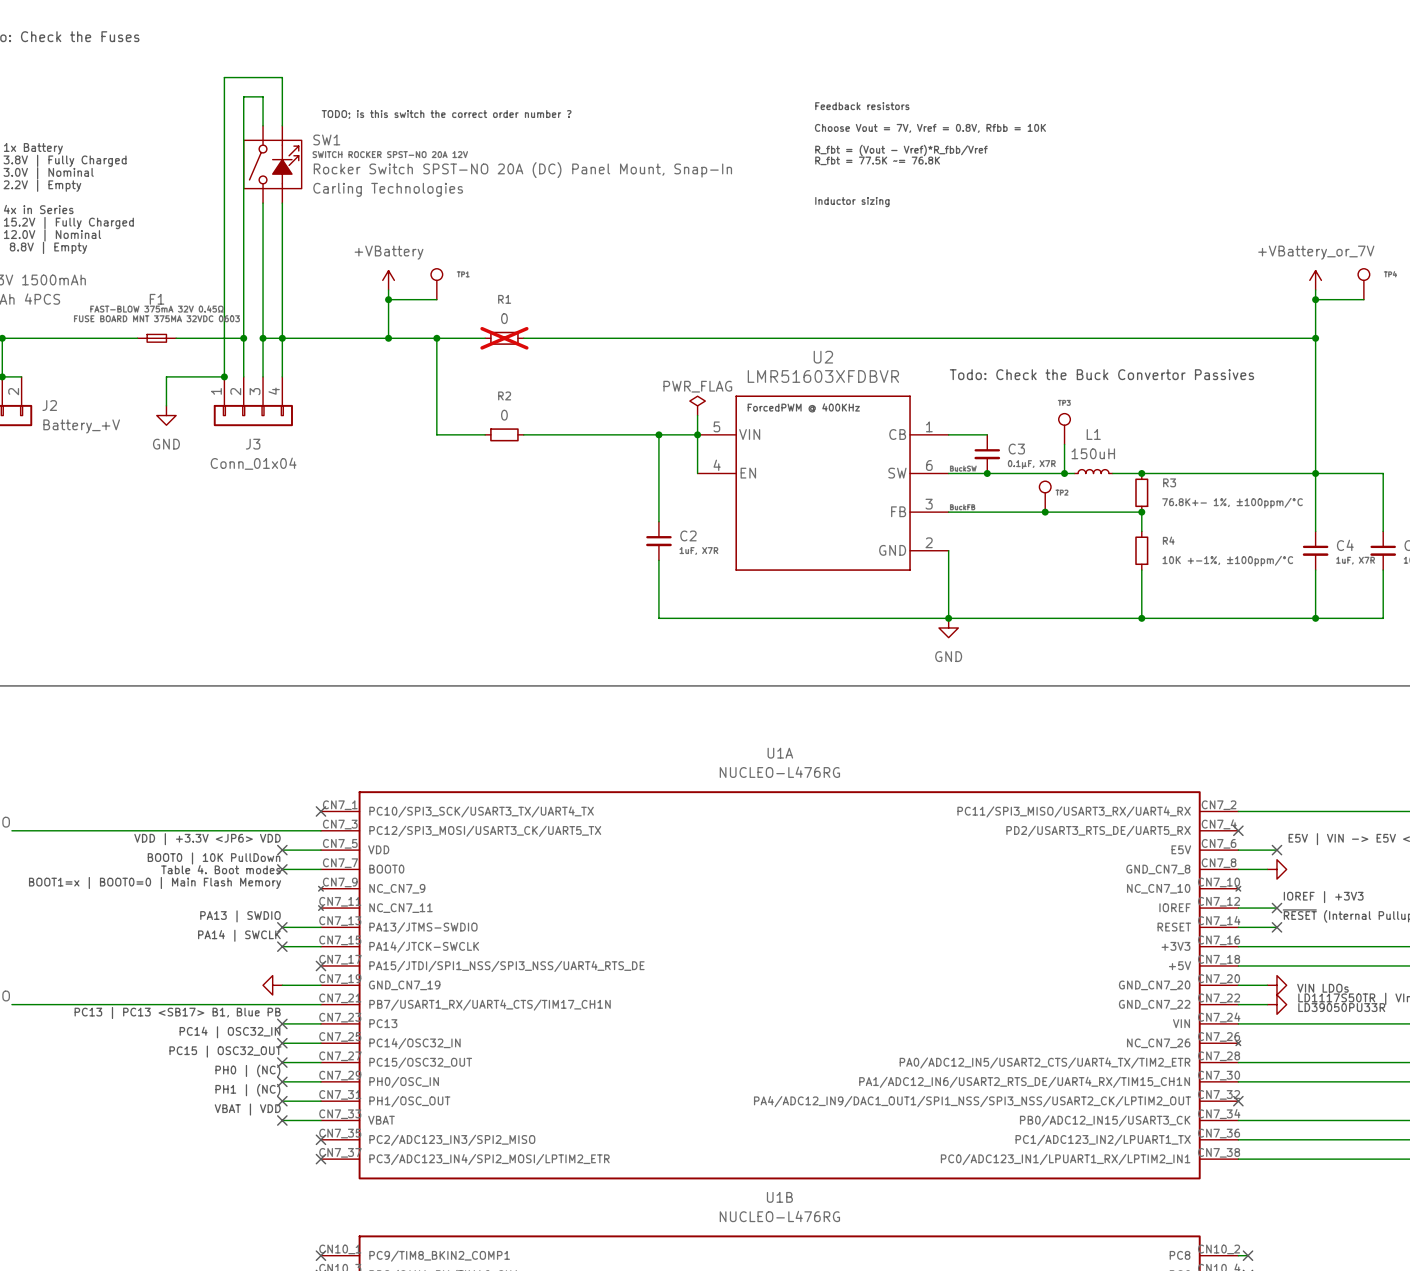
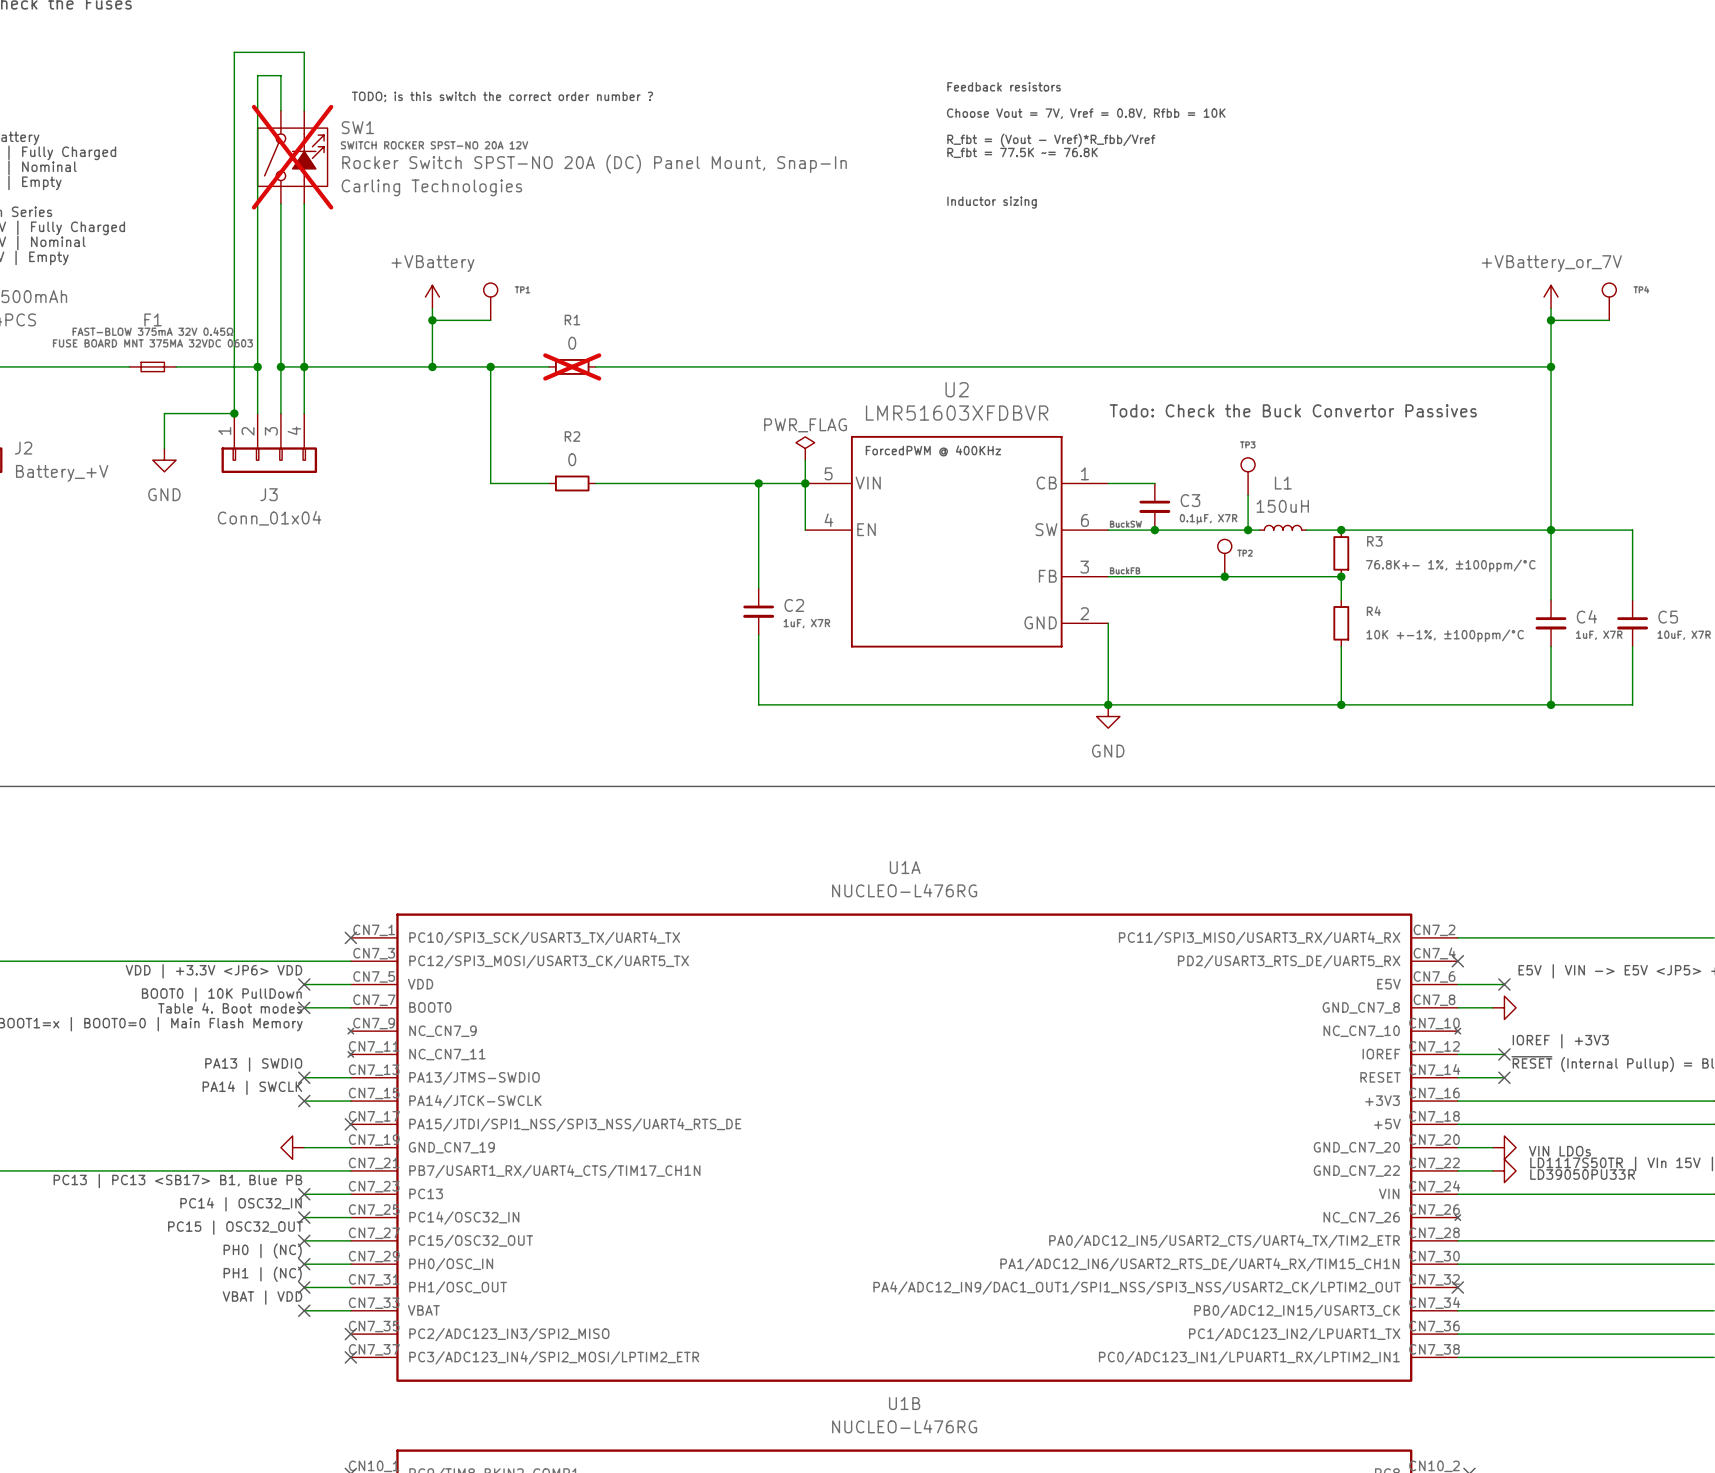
SW1 do-not-place cross: none -> (292, 157)

